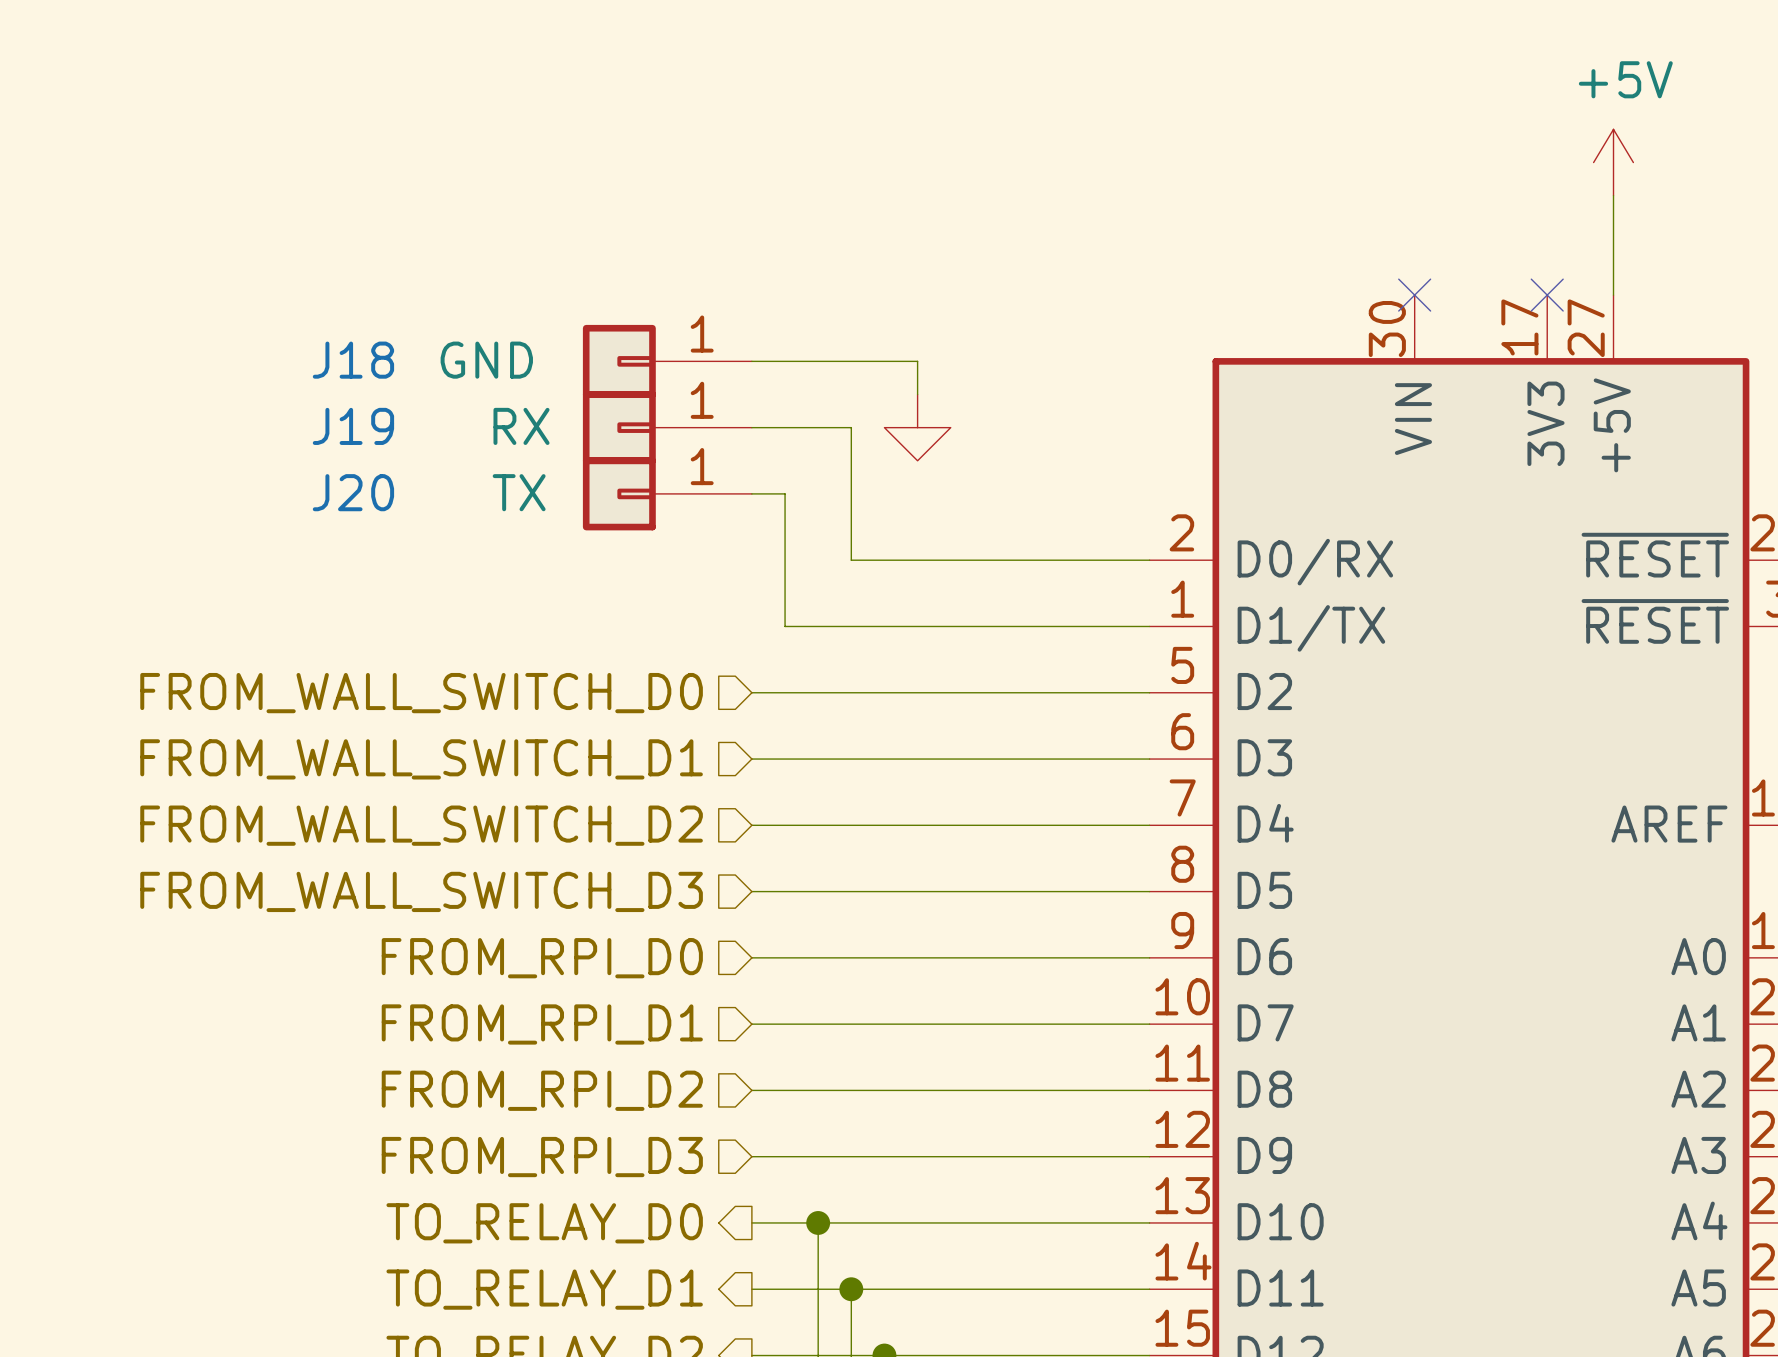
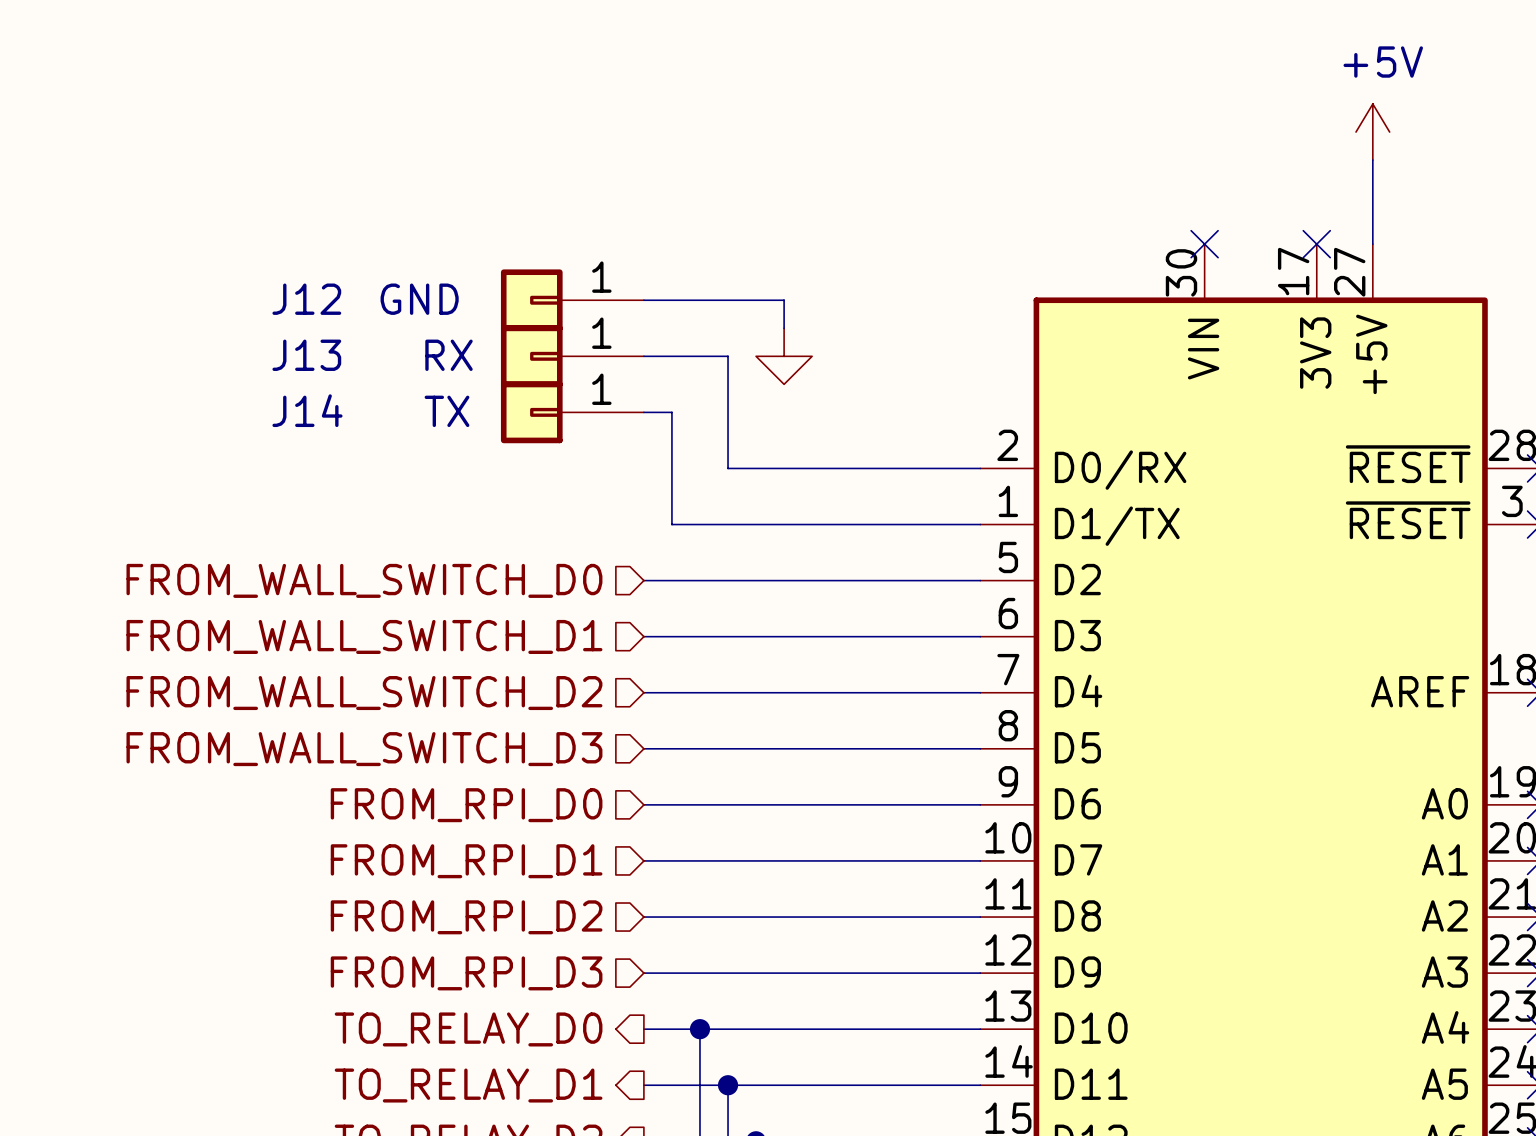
J18 name: J18 (353, 360) -> J12 (306, 299)
J19 name: J19 (353, 426) -> J13 (306, 355)
J20 name: J20 (353, 492) -> J14 (307, 410)

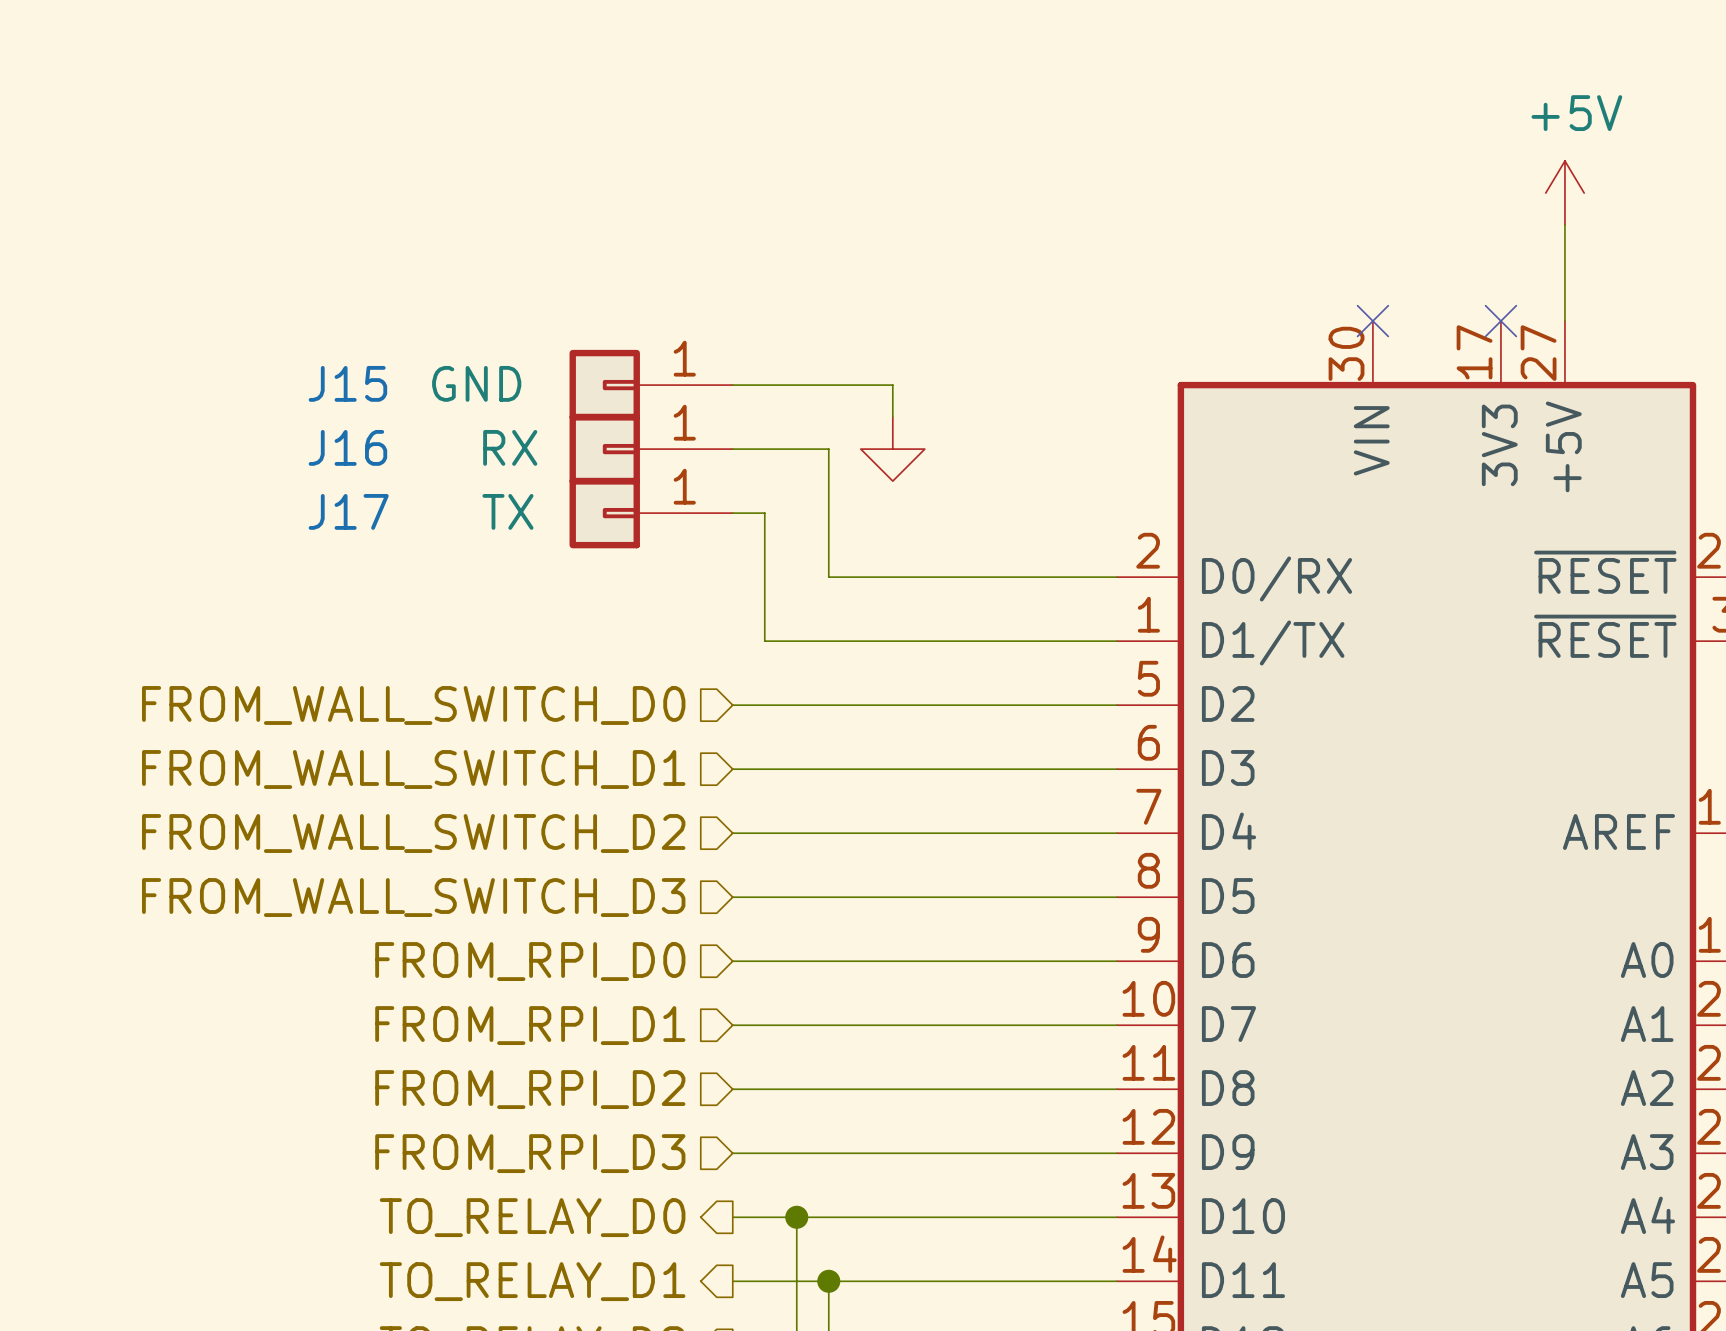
J12 name: J12 (306, 299) -> J15 (347, 383)
J13 name: J13 (306, 355) -> J16 (347, 447)
J14 name: J14 (307, 410) -> J17 (348, 511)

